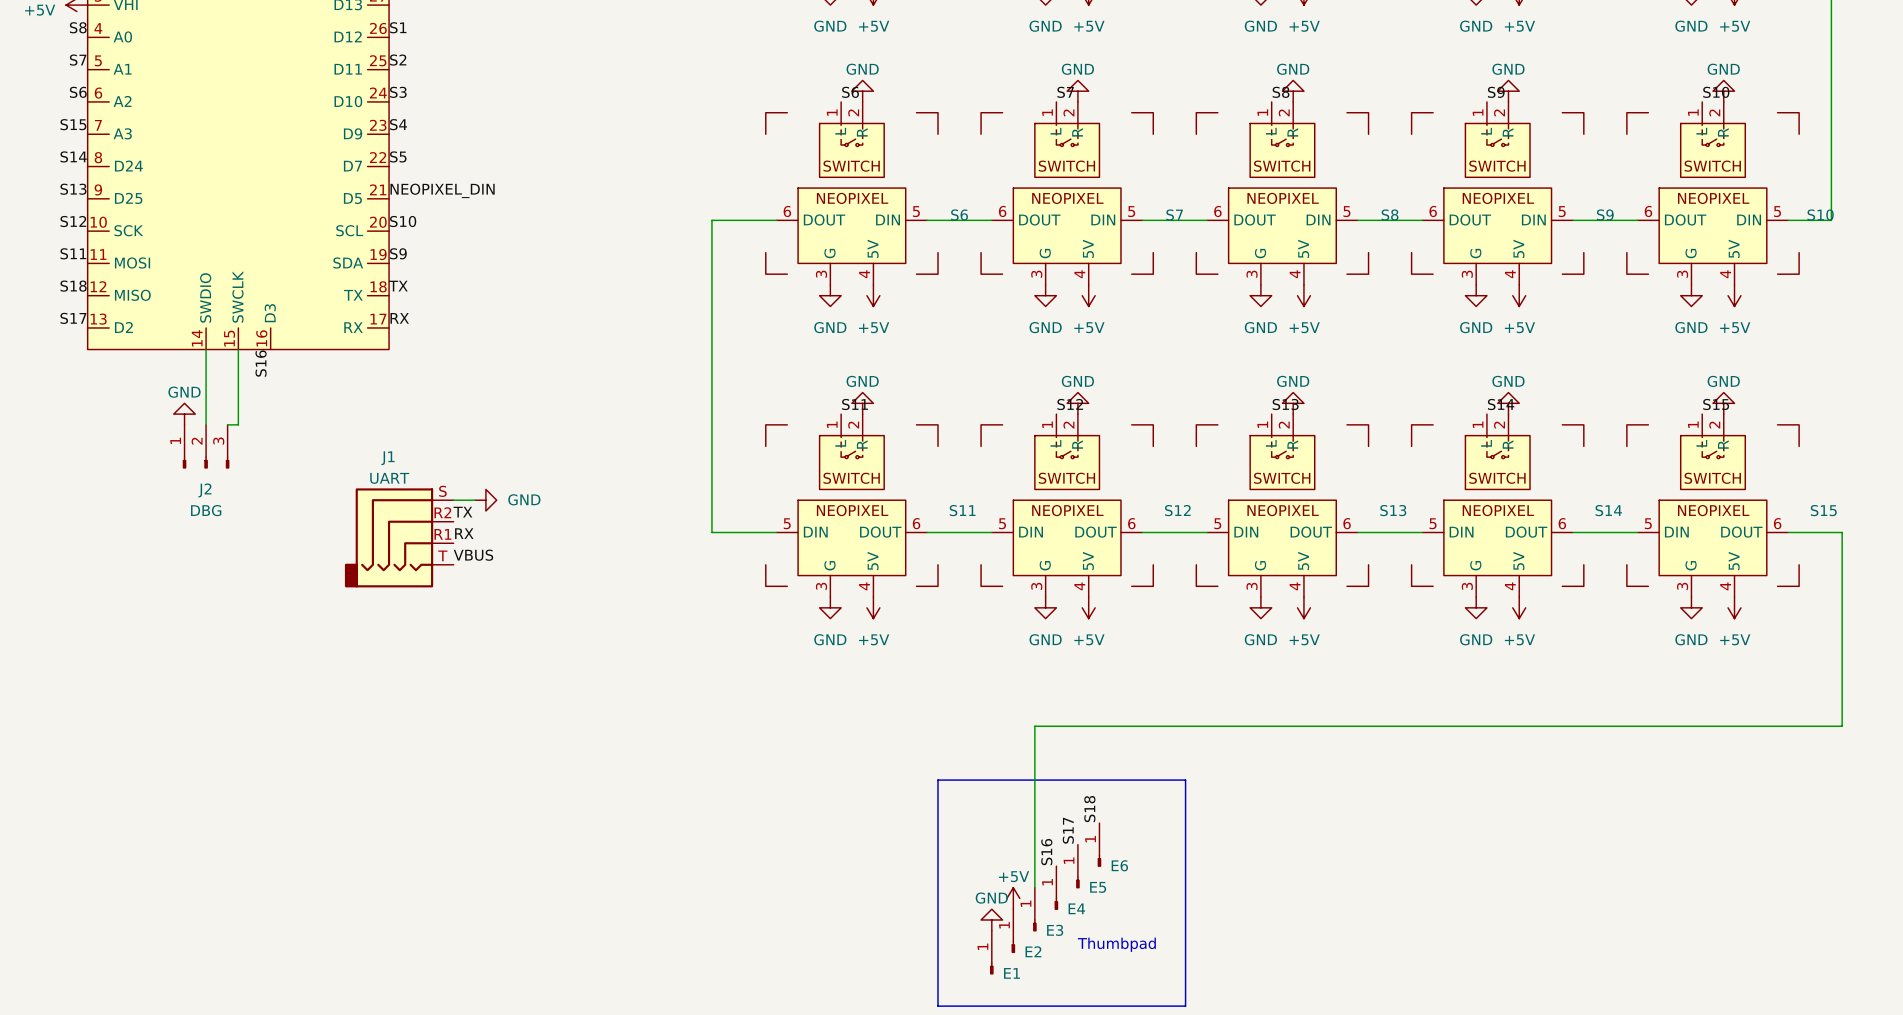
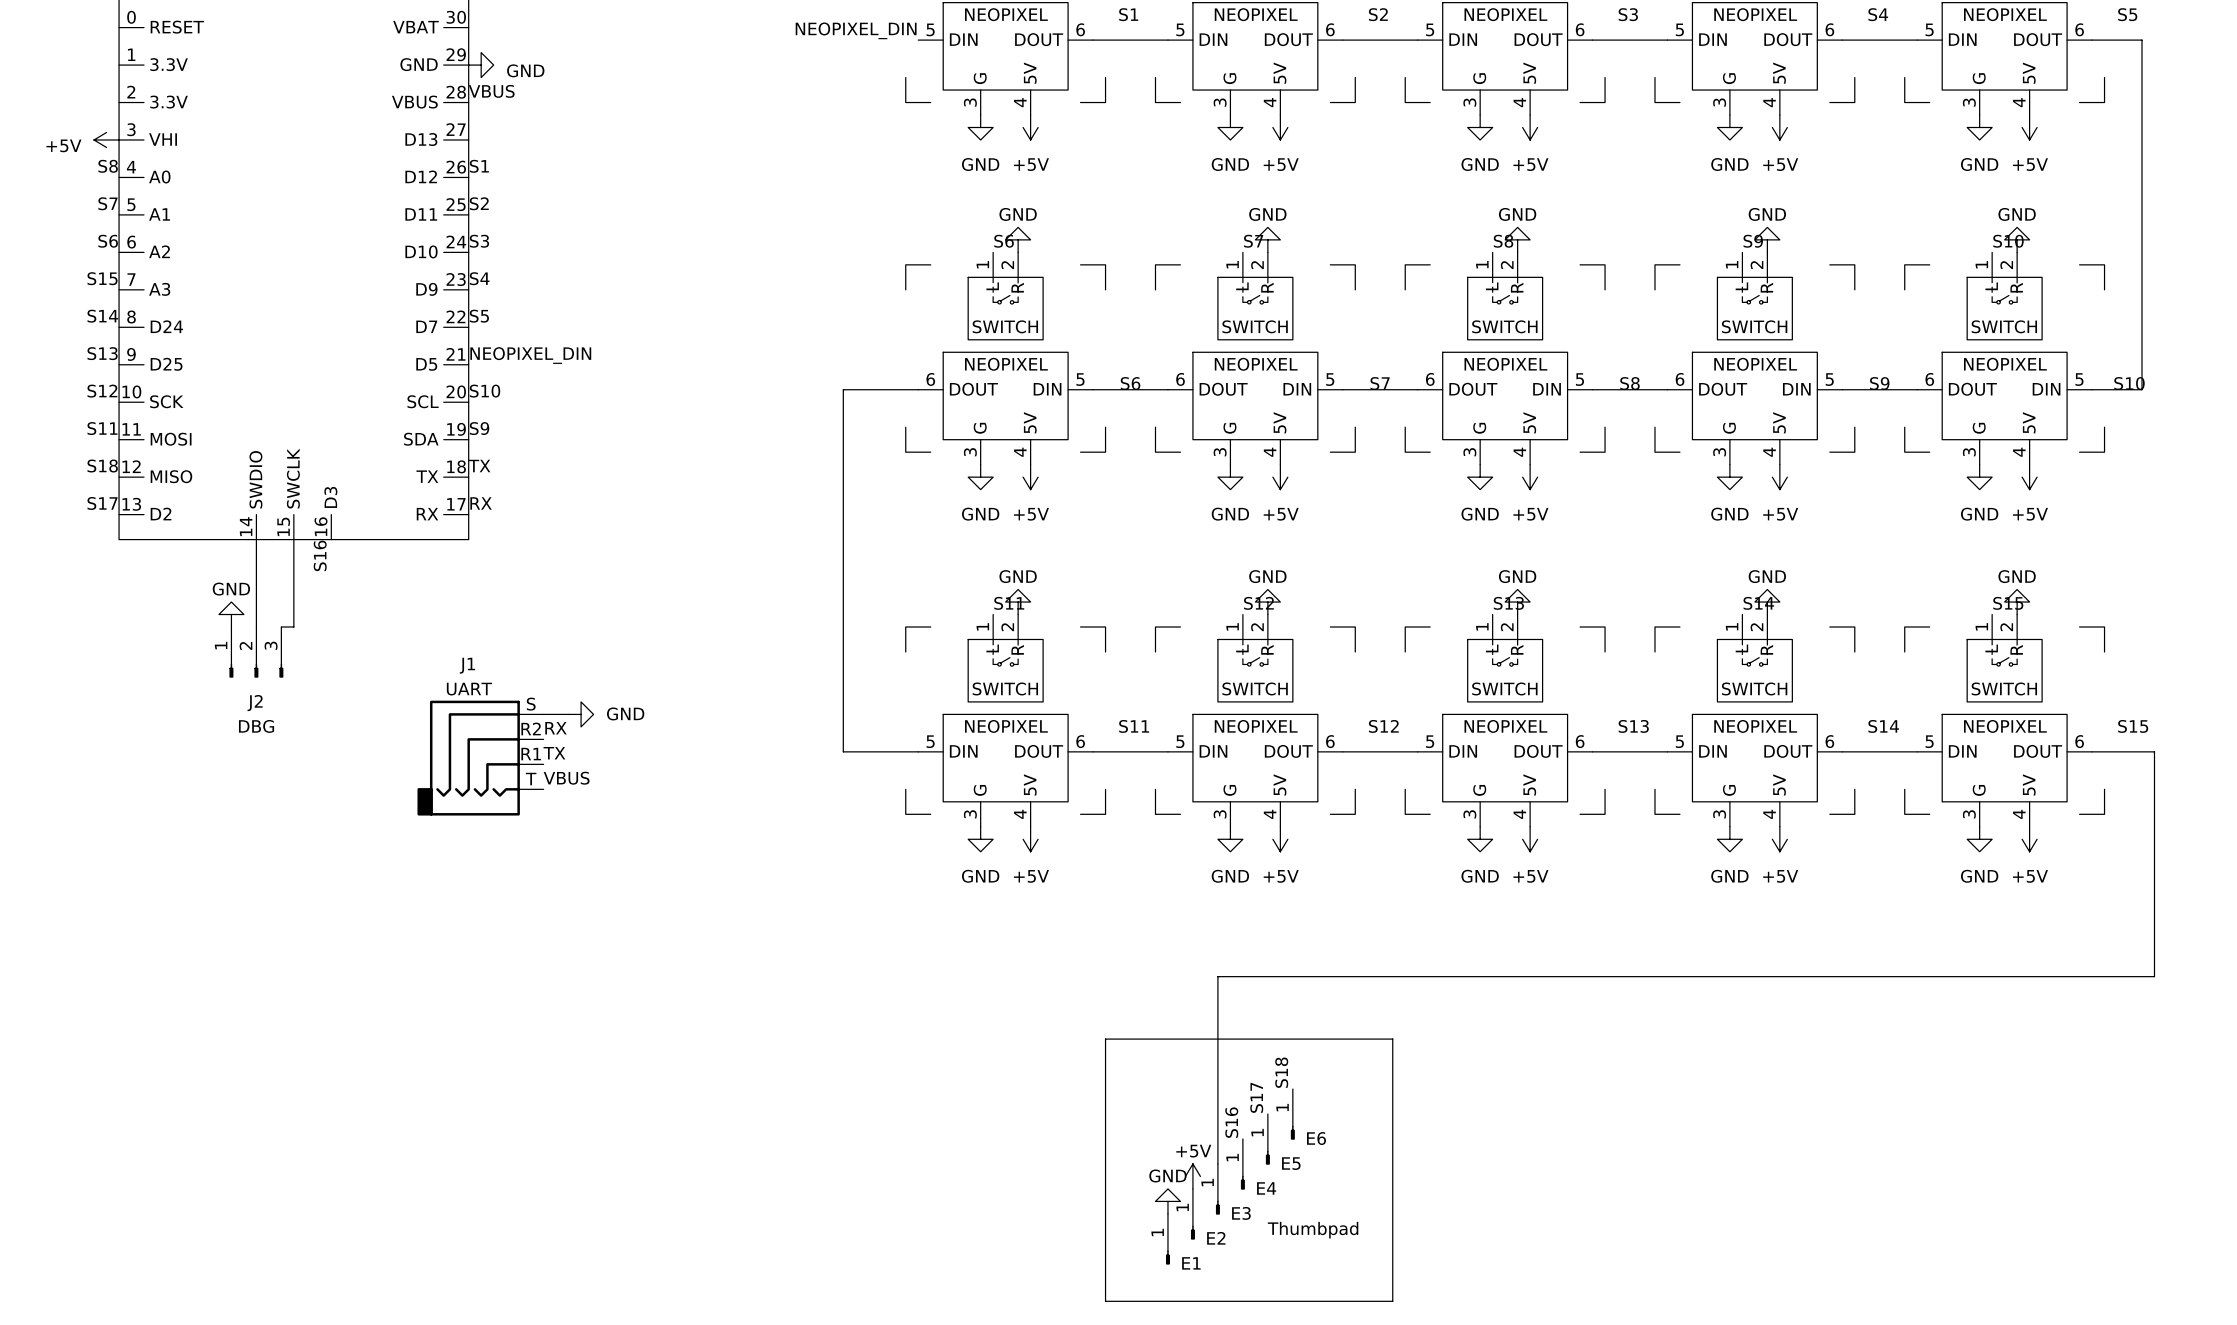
label: TX (462, 512) -> RX (556, 728)
label: RX (464, 533) -> TX (554, 753)

